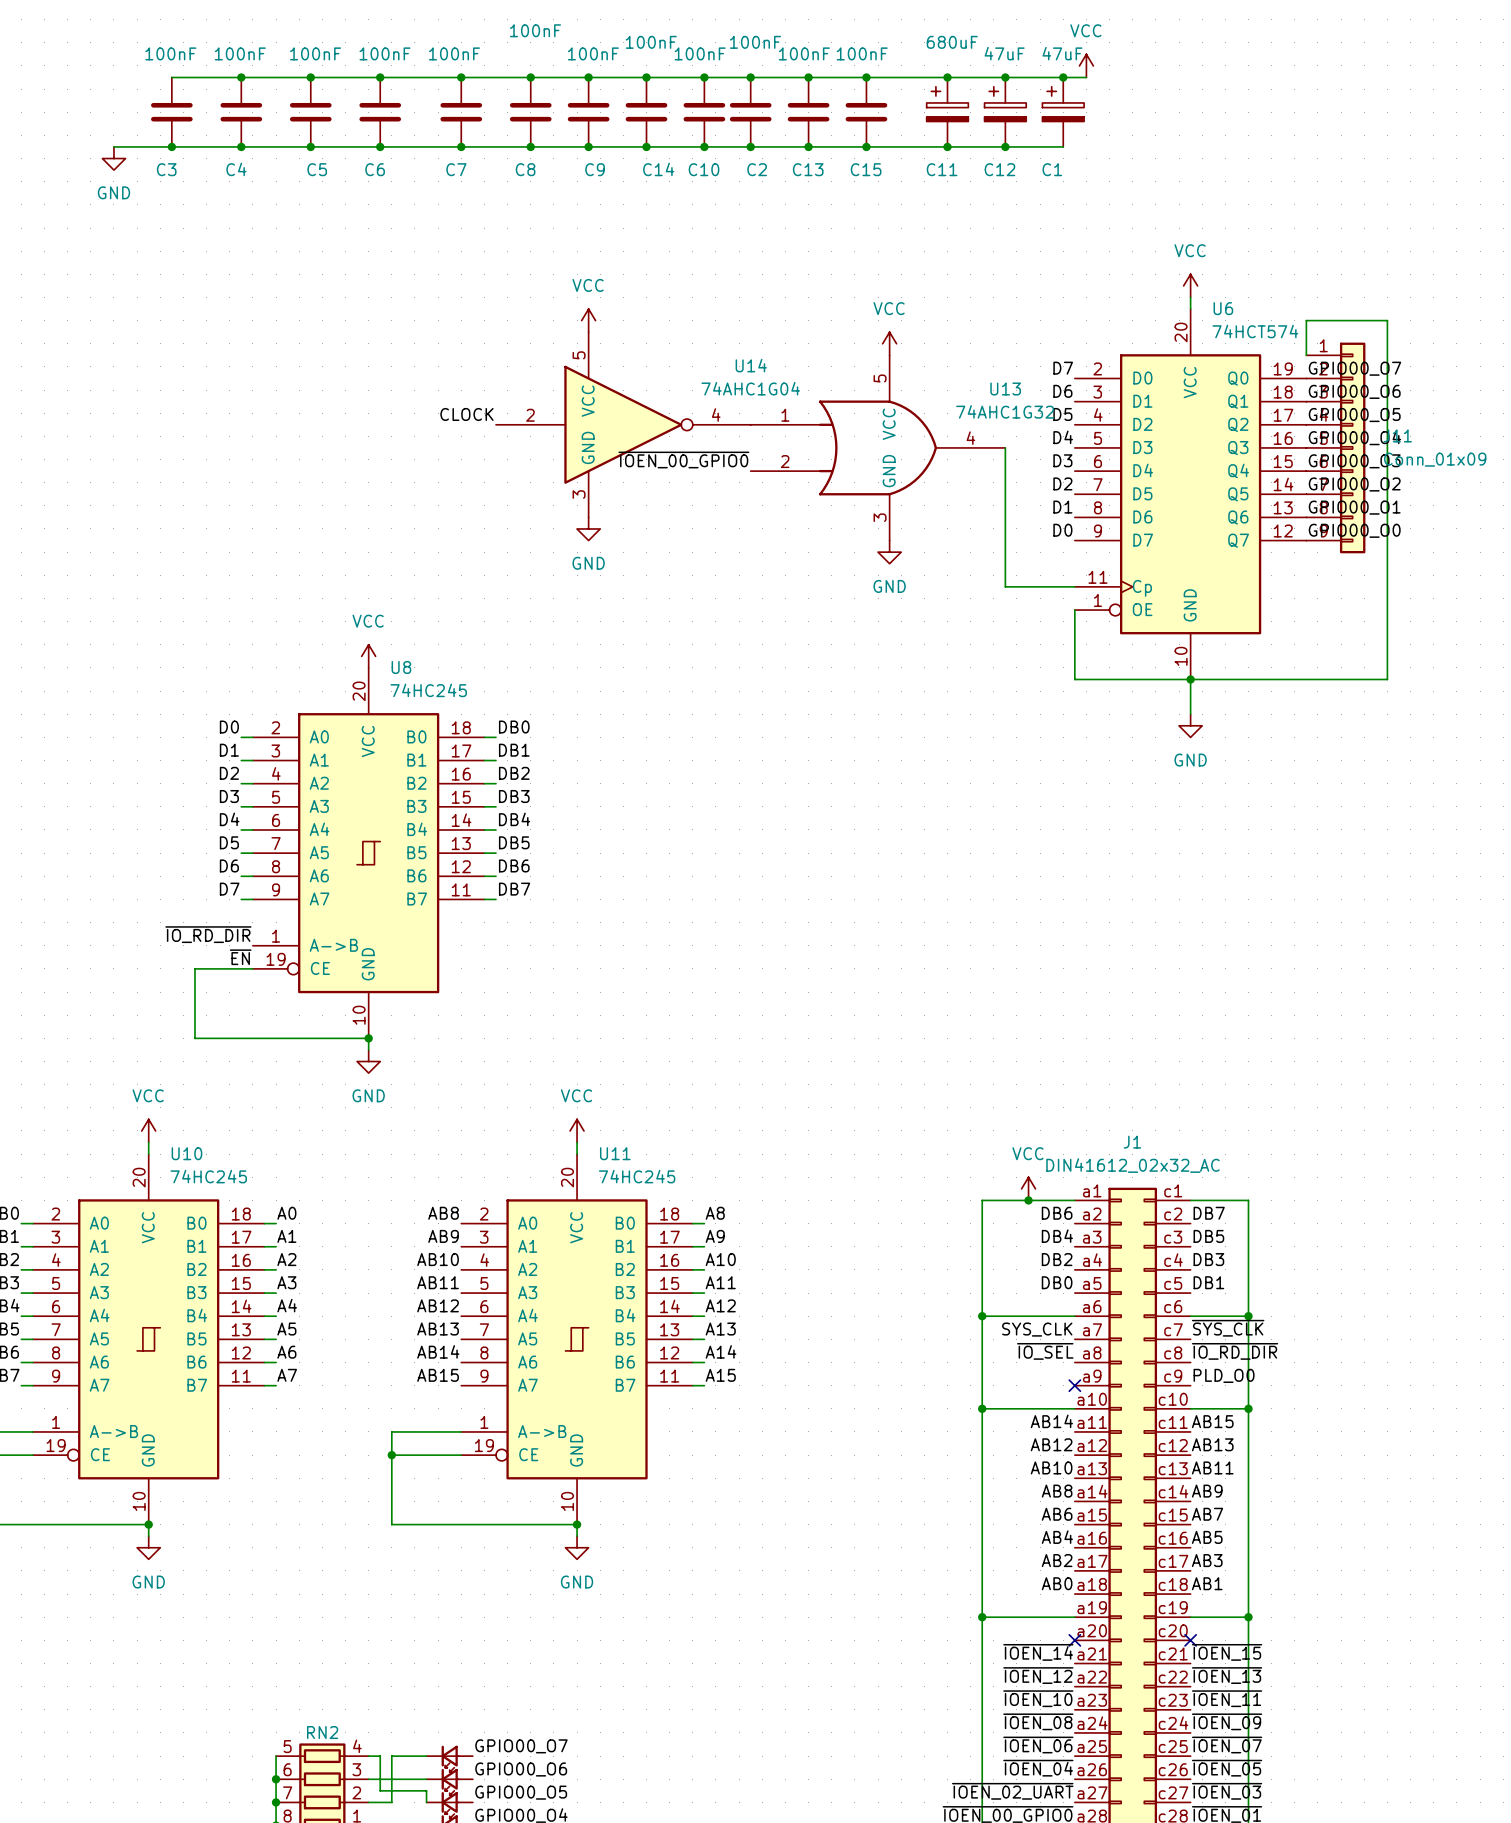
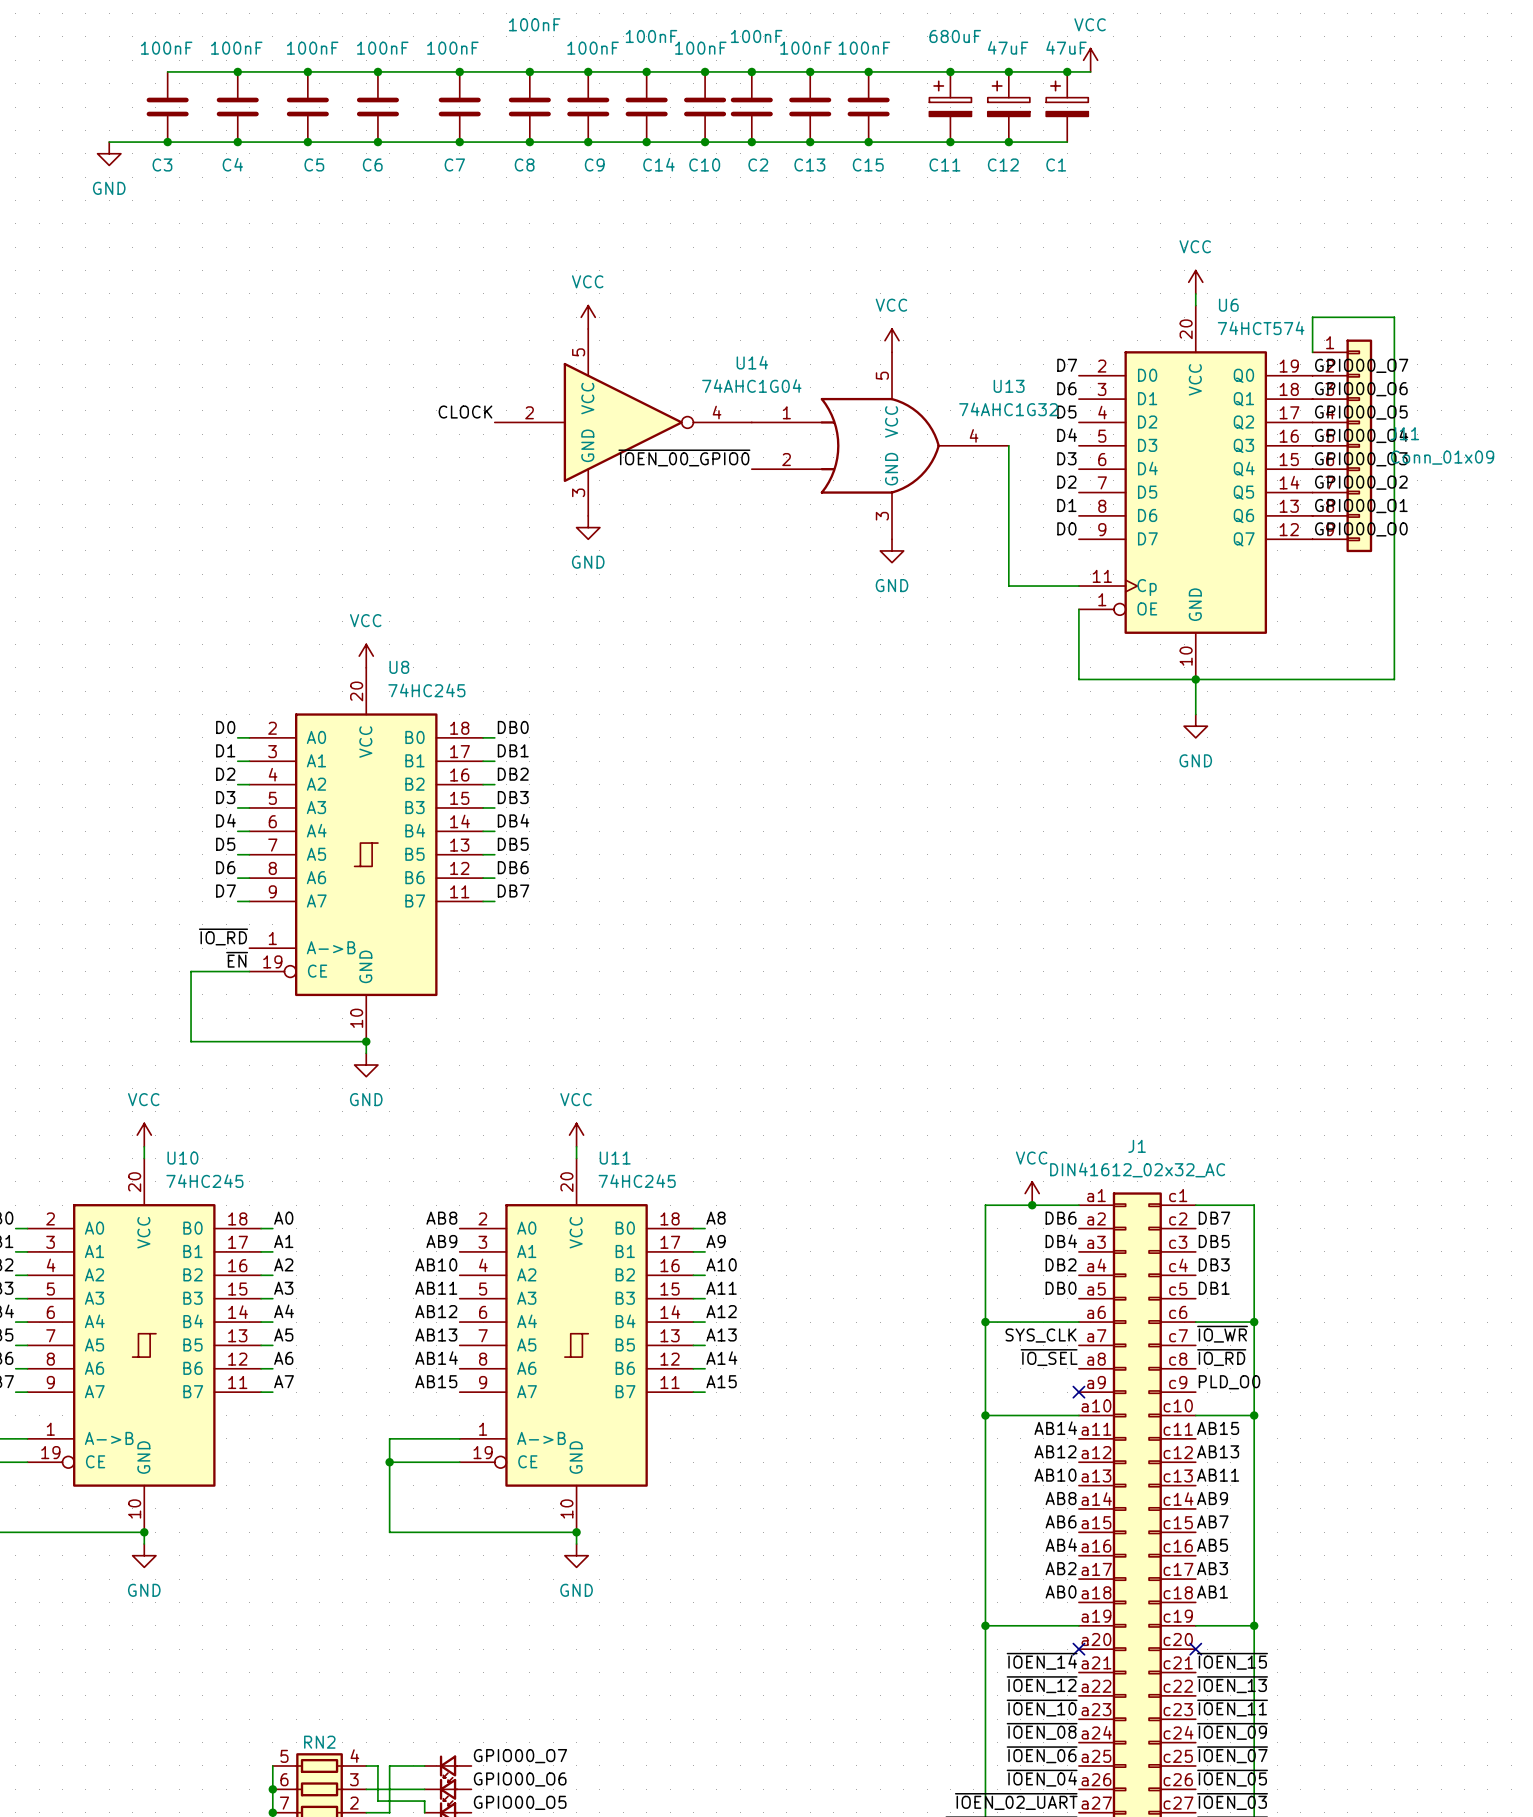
label: ~{IO_RD_DIR} (208, 934) -> ~{IO_RD} (223, 936)
label: ~{SYS_CLK} (1228, 1328) -> ~{IO_WR} (1222, 1334)
label: ~{IO_RD_DIR} (1235, 1351) -> ~{IO_RD} (1221, 1357)

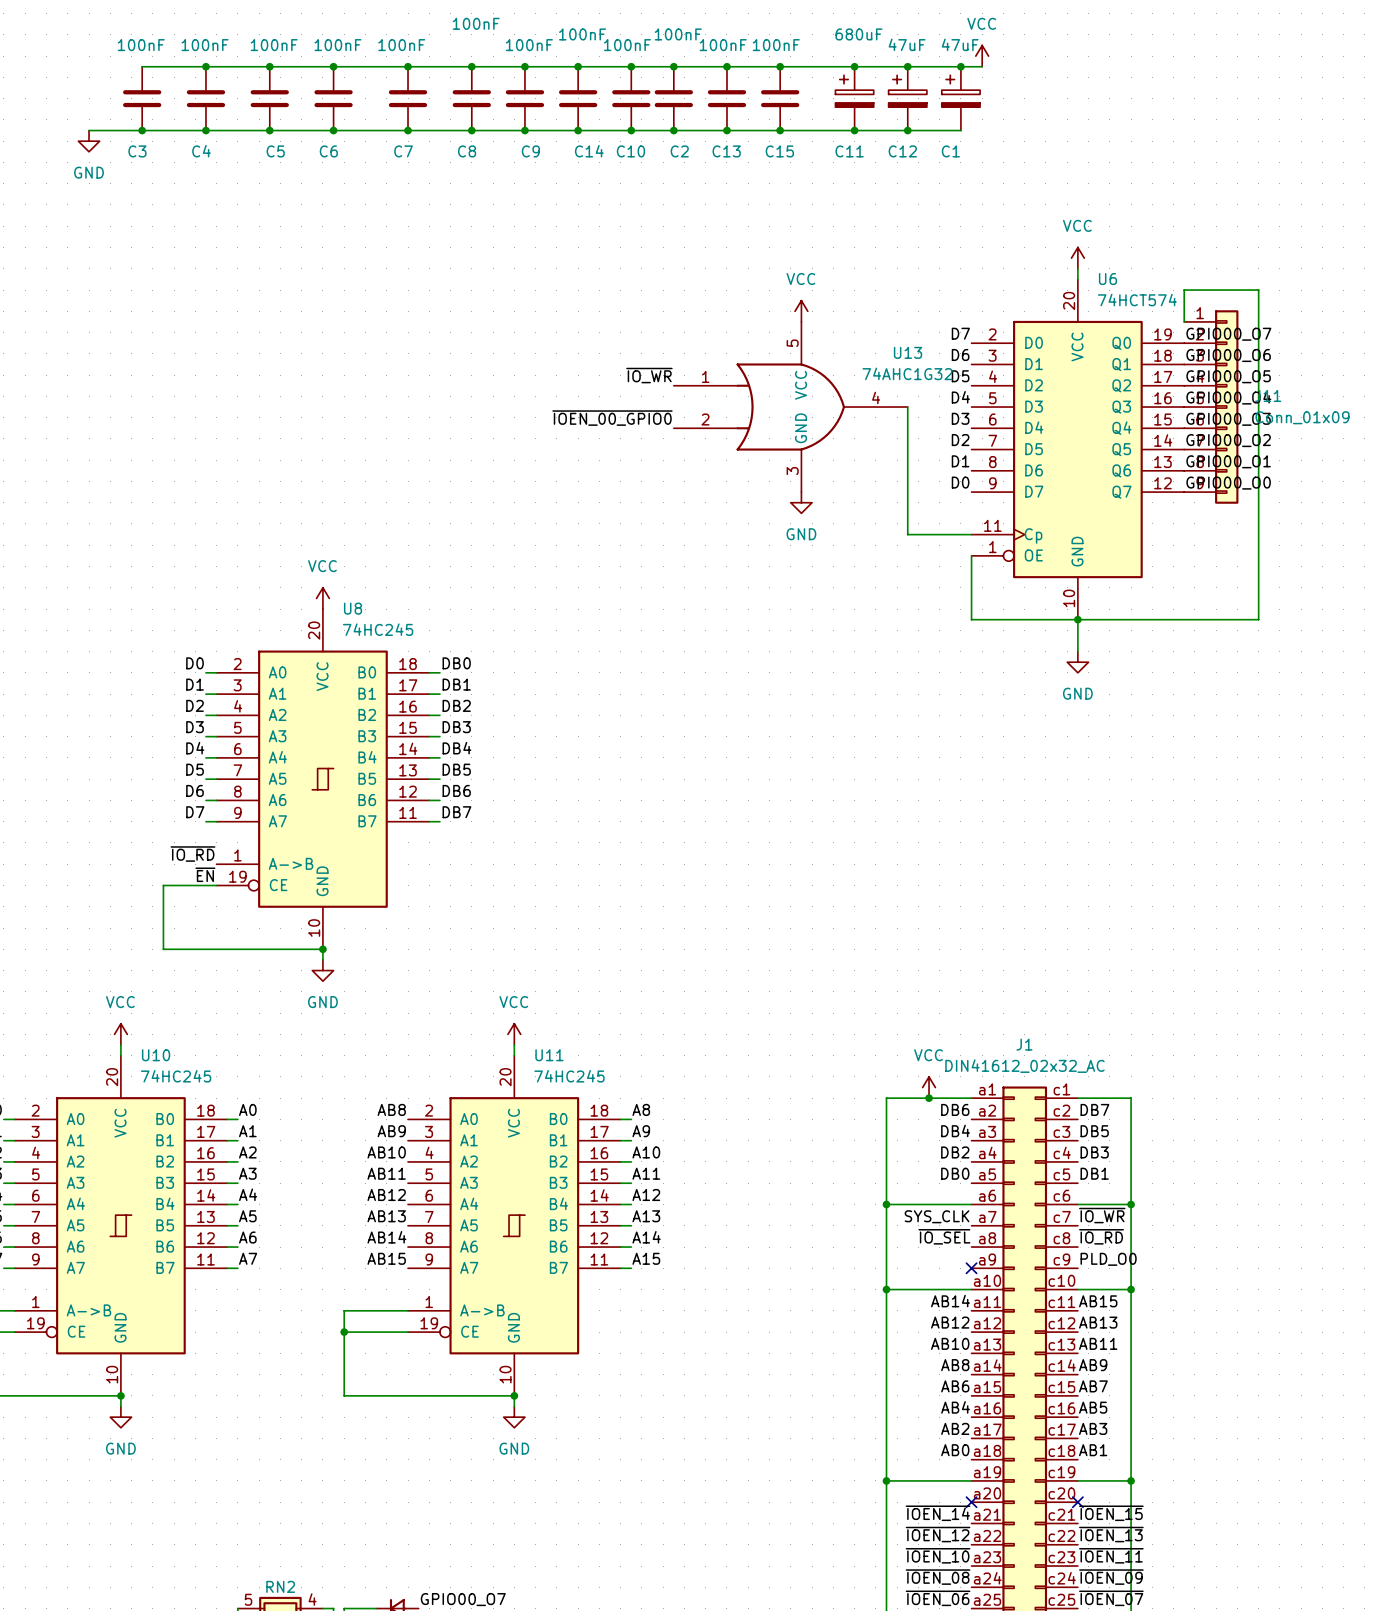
power symbol: VCC (588, 317) -> none
label: none -> ~{IO_WR} (649, 375)
label: CLOCK (465, 412) -> none
U14: 74AHC1G04 (623, 422) -> none
power symbol: GND (588, 527) -> none

